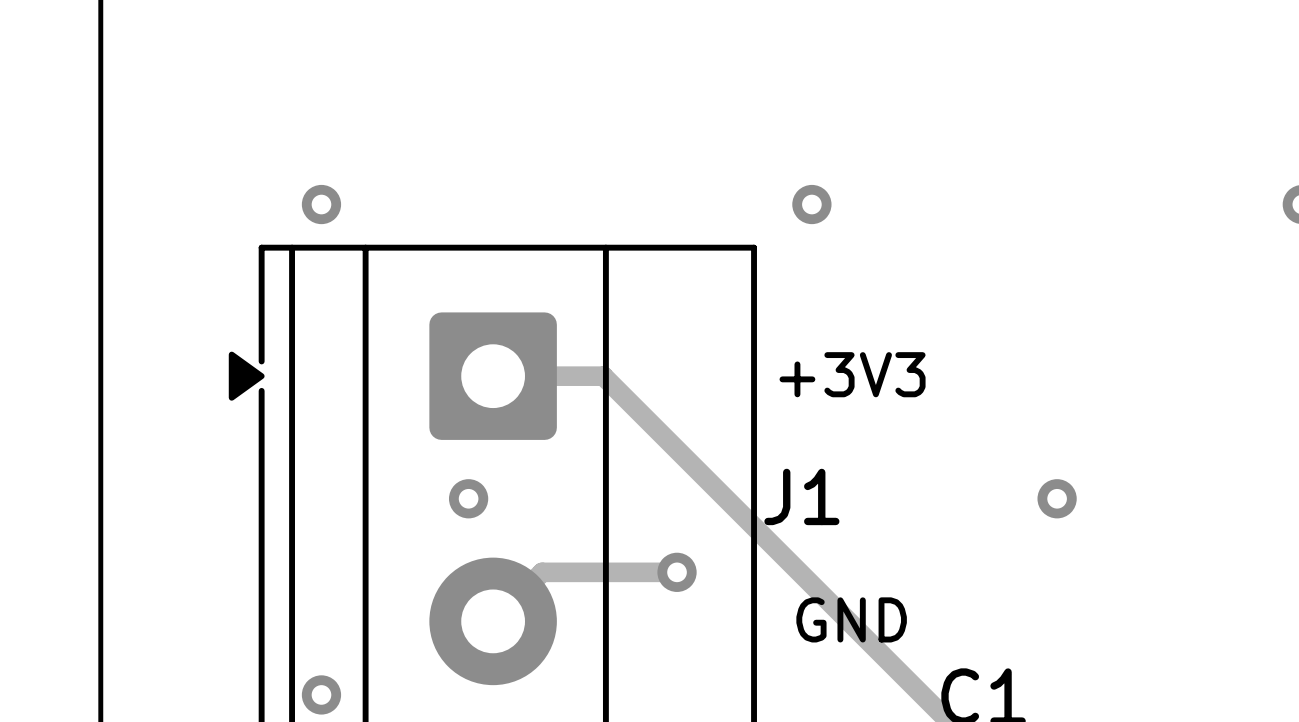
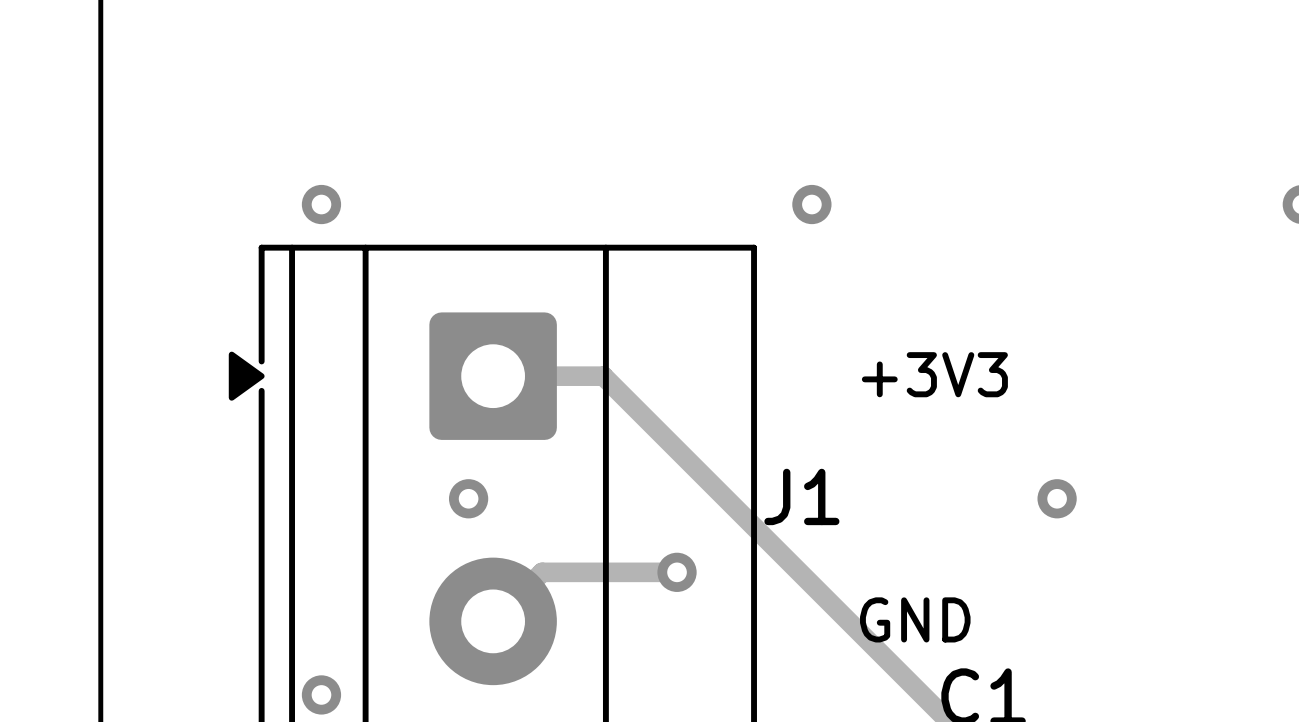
text position: +3V3 (852, 374) -> +3V3 (934, 374)
text position: GND (851, 619) -> GND (915, 619)

